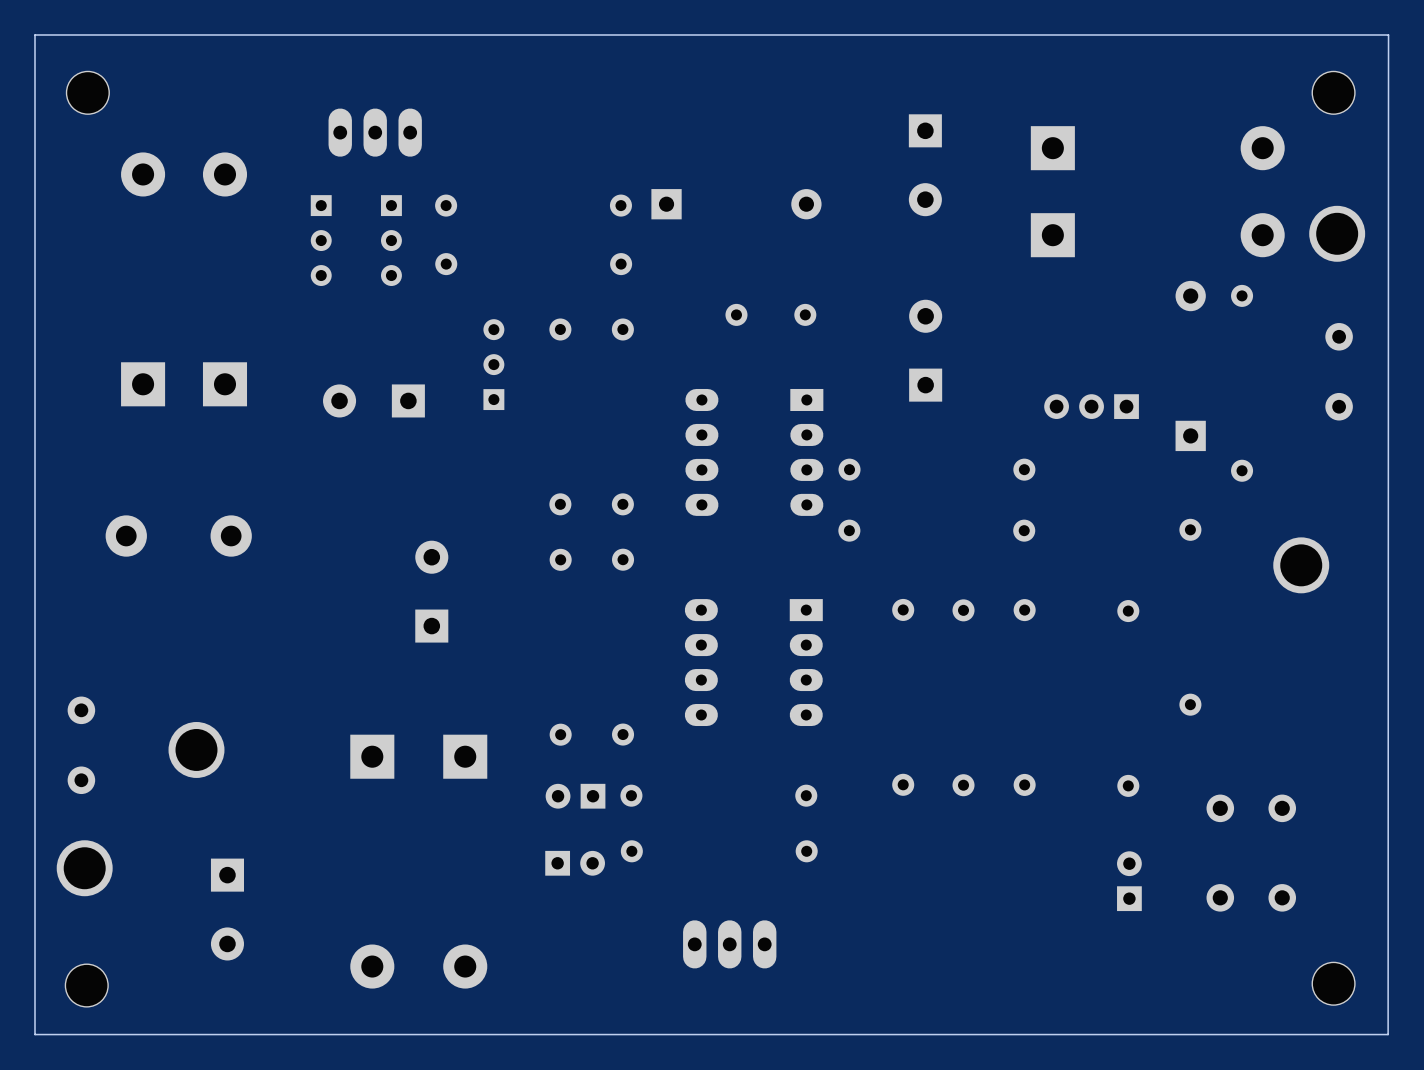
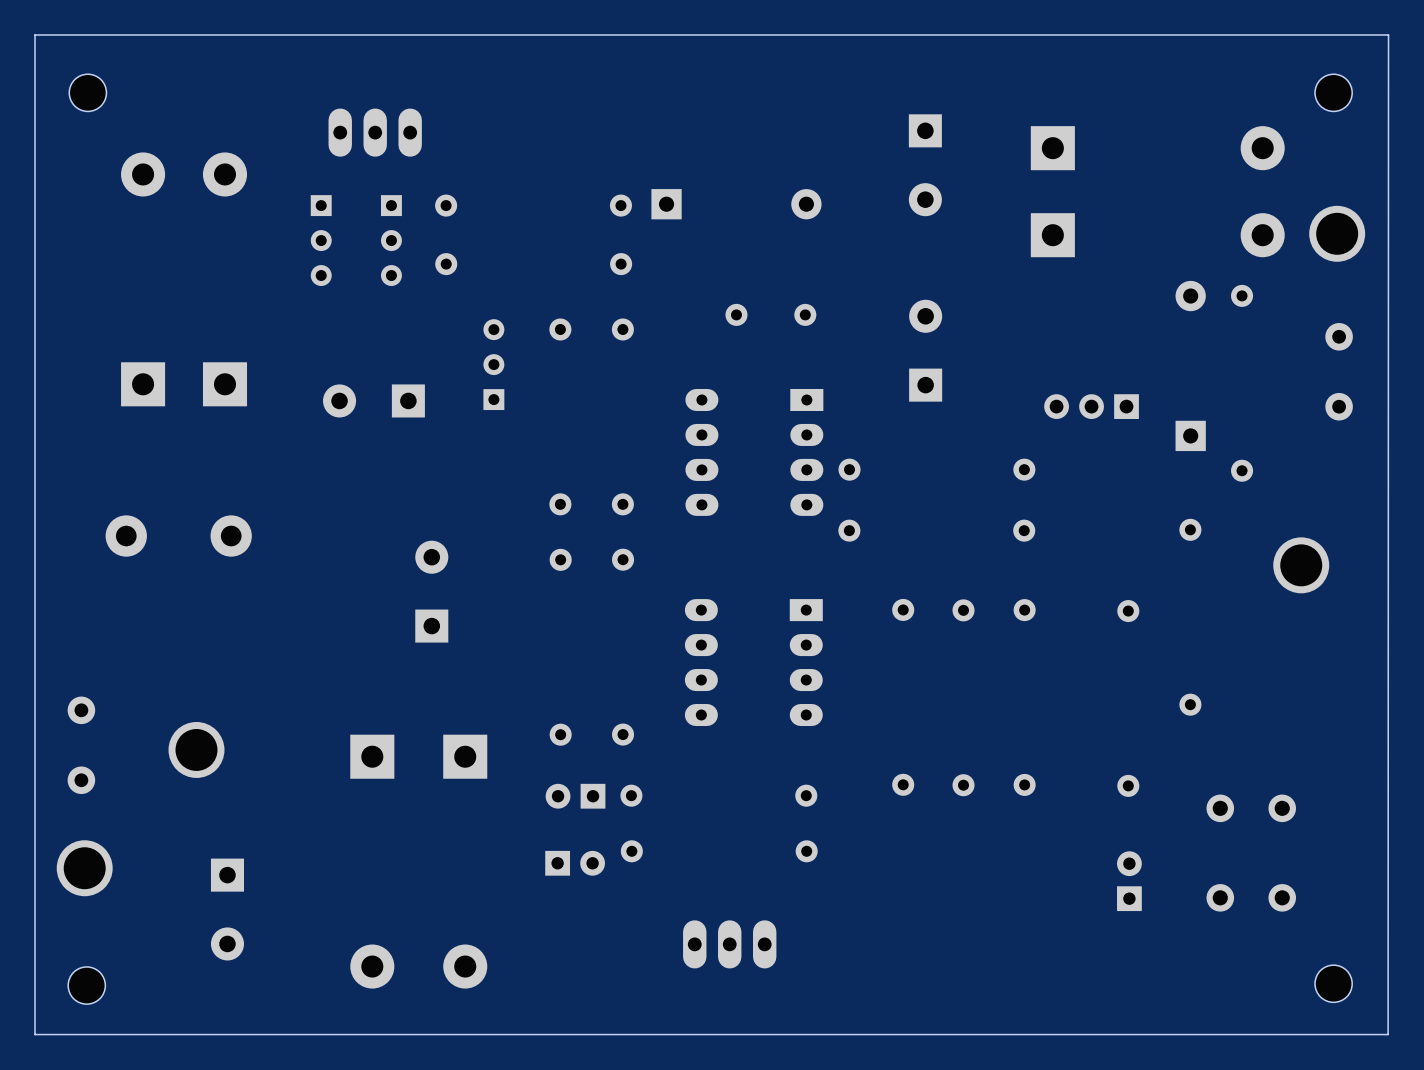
part footprint: [65, 70, 110, 115] -> [69, 74, 107, 112]
part footprint: [1311, 70, 1356, 115] -> [1315, 74, 1353, 112]
part footprint: [1311, 961, 1356, 1006] -> [1315, 965, 1353, 1003]
part footprint: [64, 963, 109, 1008] -> [68, 966, 106, 1005]

